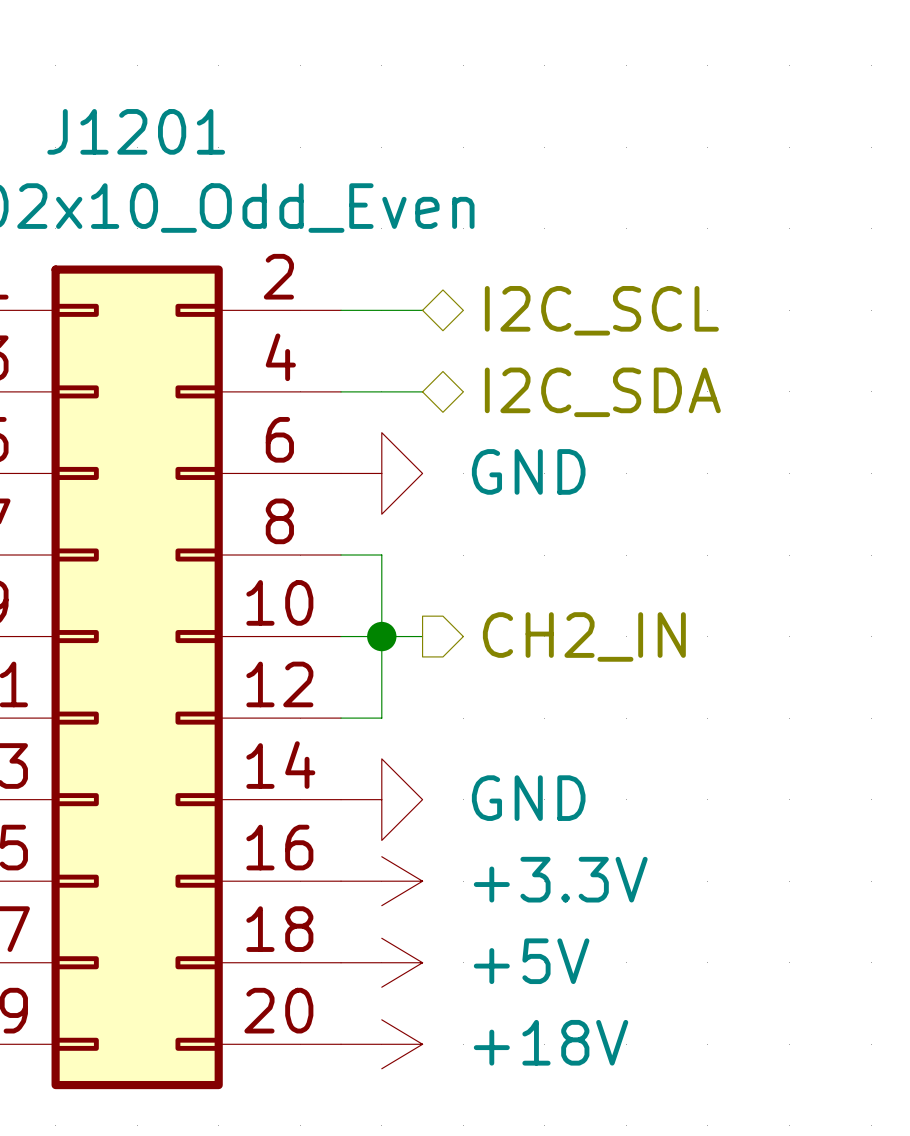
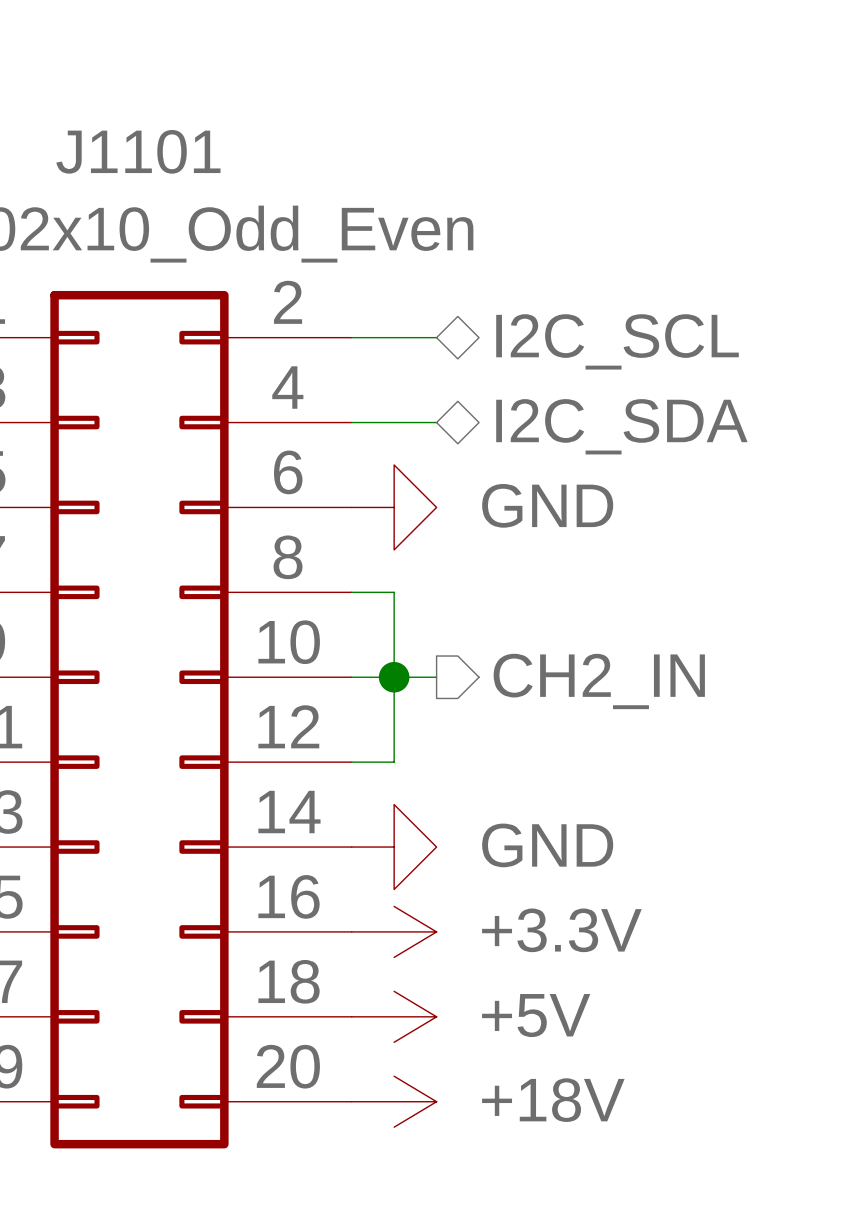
J1201 name: J1201 (136, 131) -> J1101 (138, 151)

